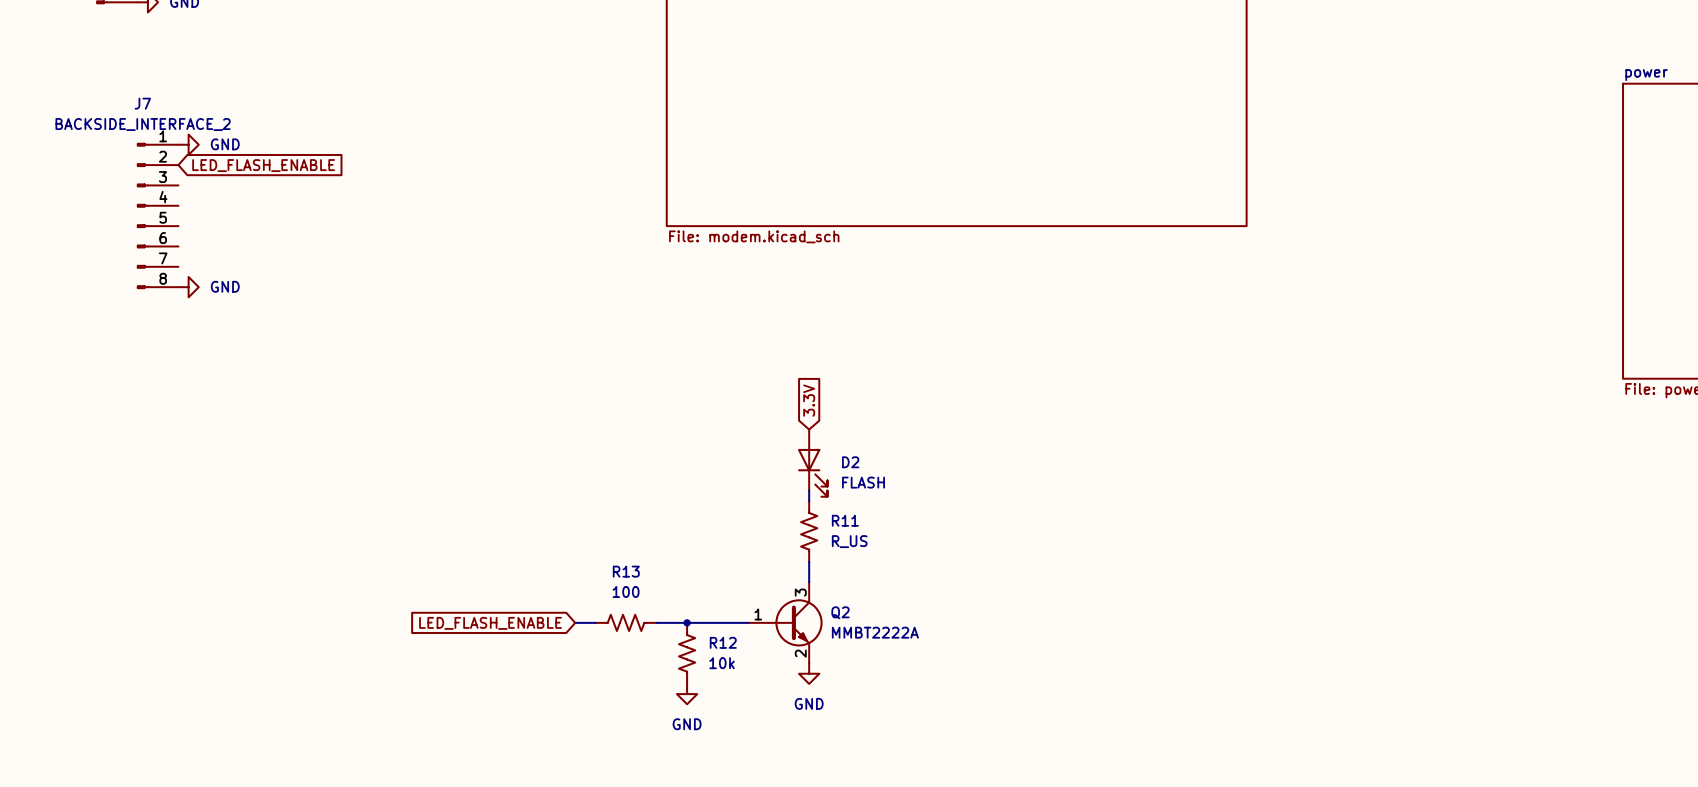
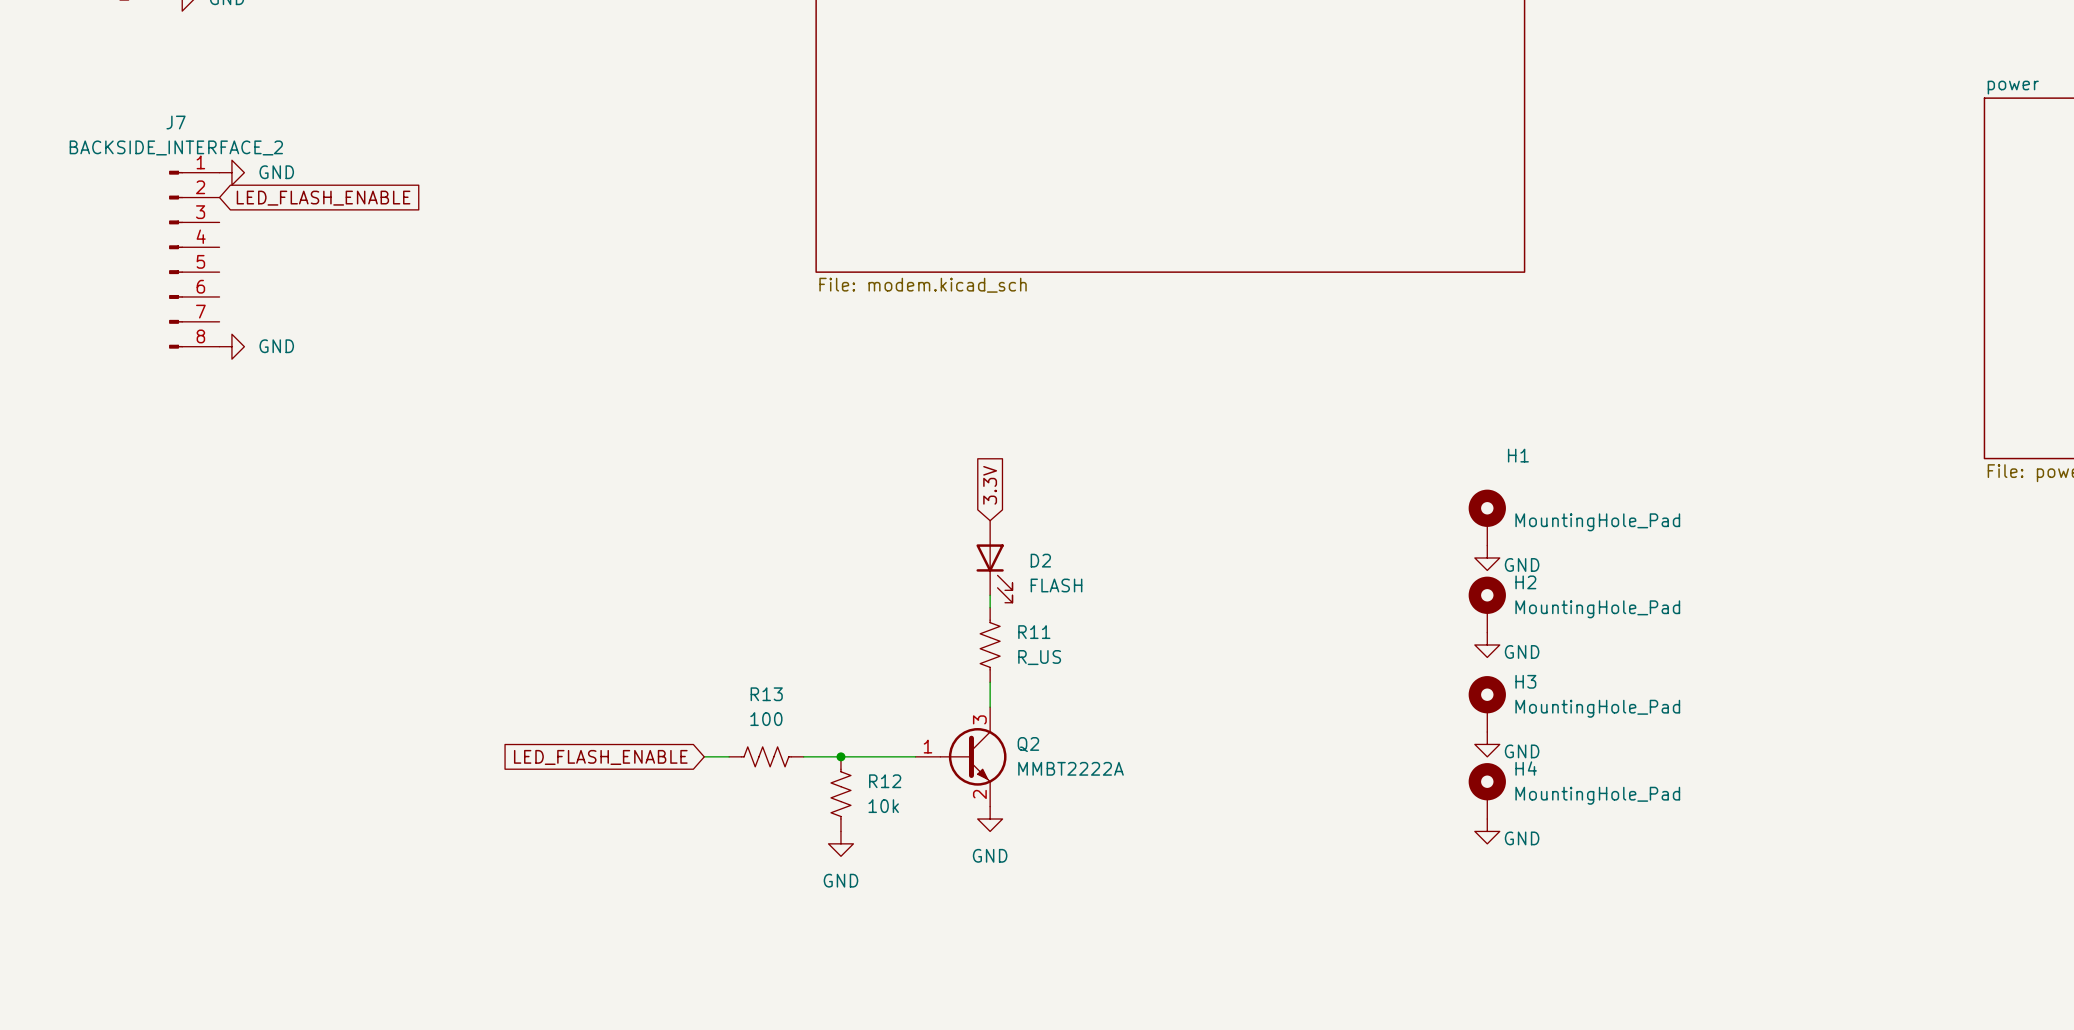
H1: none -> MountingHole_Pad (1487, 517)
power symbol: none -> GND (1487, 557)
H2: none -> MountingHole_Pad (1487, 604)
power symbol: none -> GND (1487, 644)
H3: none -> MountingHole_Pad (1487, 704)
power symbol: none -> GND (1487, 744)
H4: none -> MountingHole_Pad (1487, 791)
power symbol: none -> GND (1487, 831)

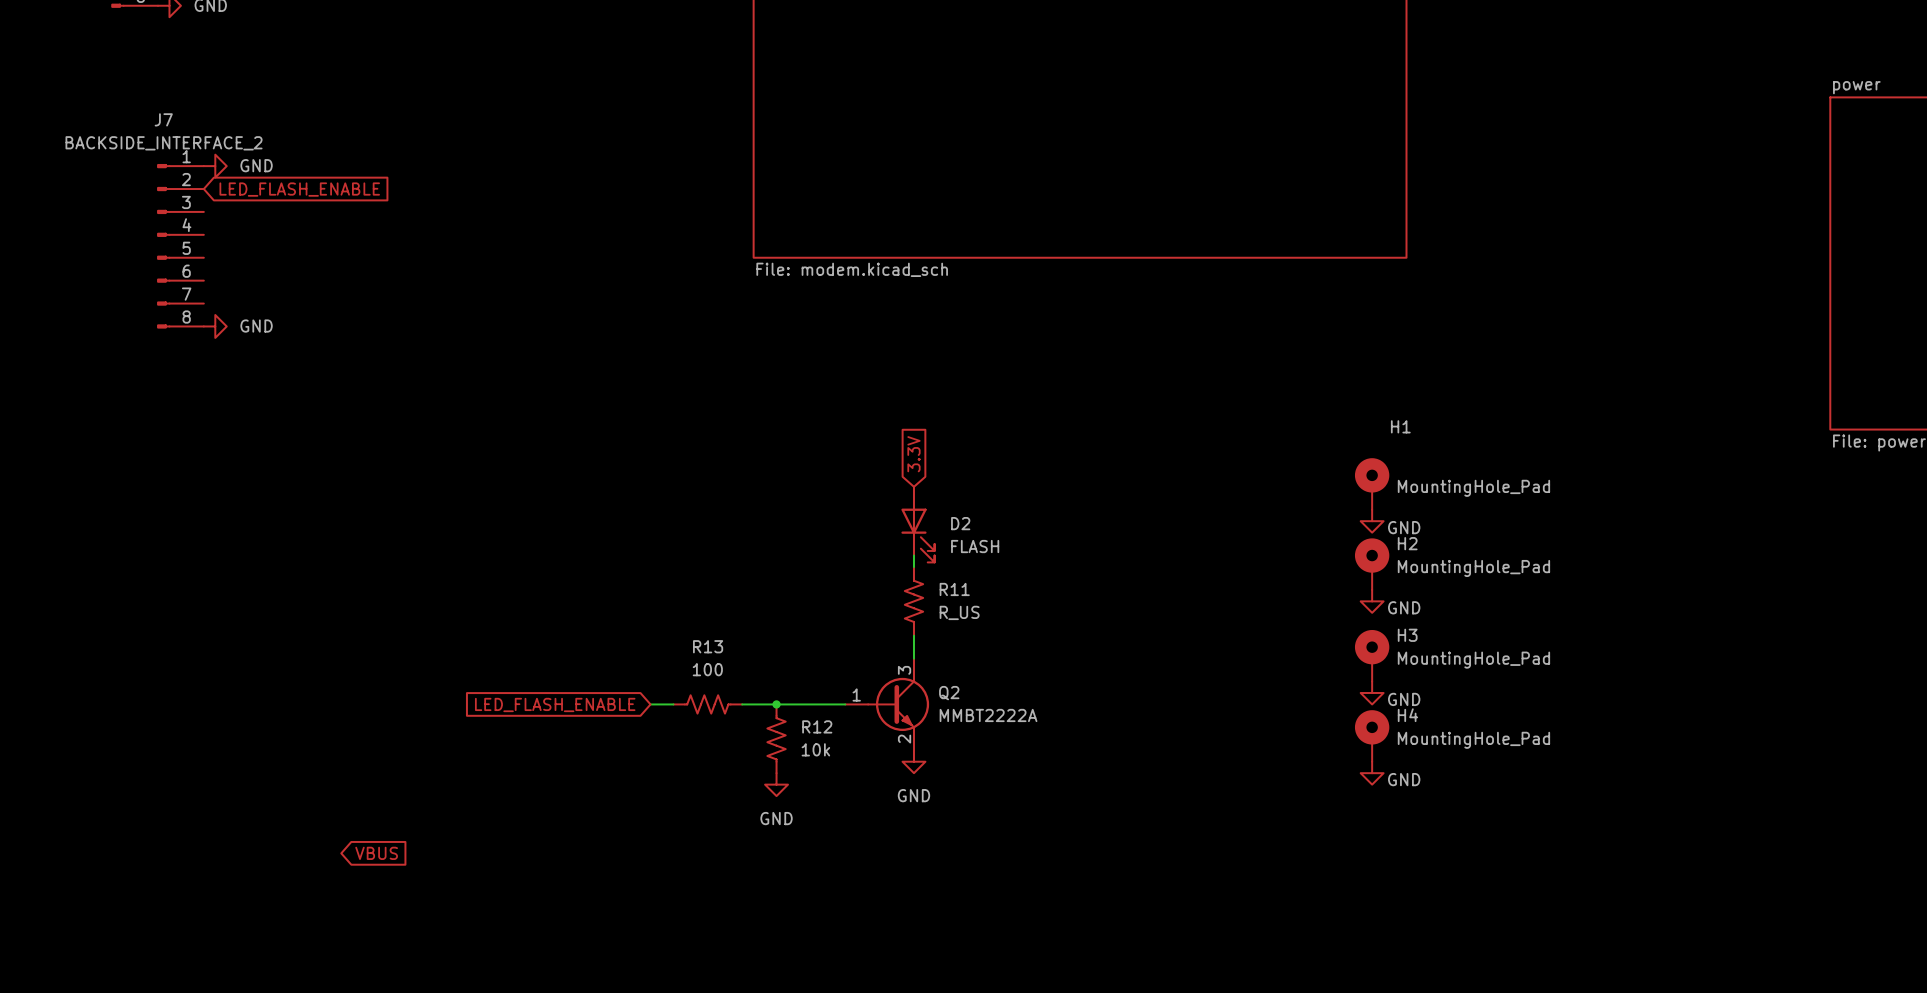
global label: none -> VBUS (376, 853)

